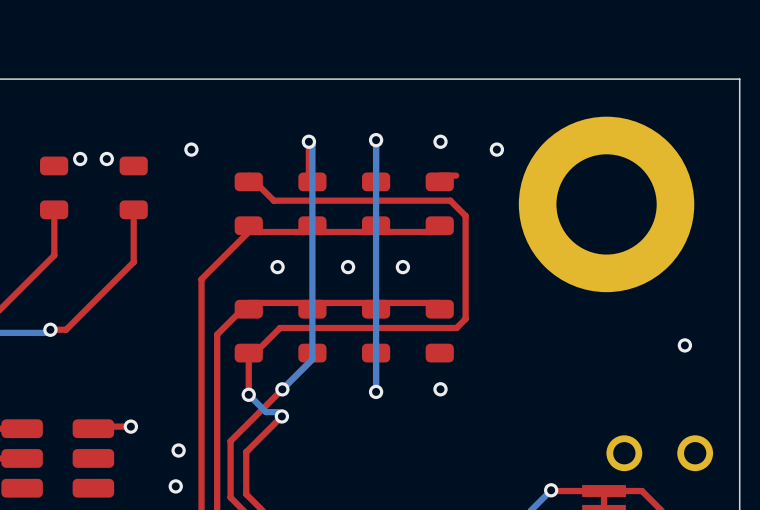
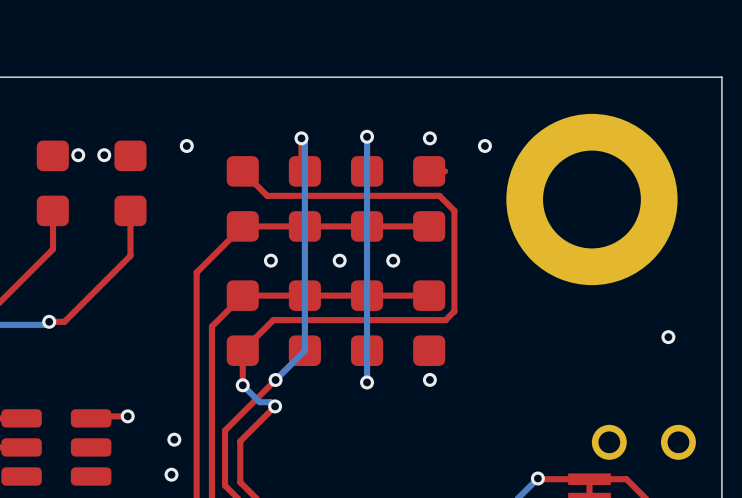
part footprint: [40, 156, 69, 220] -> [36, 140, 69, 227]
part footprint: [119, 156, 148, 220] -> [114, 140, 147, 227]
part footprint: [234, 172, 263, 236] -> [226, 156, 259, 242]
part footprint: [298, 172, 327, 236] -> [288, 156, 321, 242]
part footprint: [361, 172, 391, 236] -> [350, 156, 384, 242]
part footprint: [425, 172, 454, 236] -> [413, 156, 446, 242]
part footprint: [234, 299, 263, 363] -> [226, 280, 259, 366]
part footprint: [298, 299, 327, 363] -> [288, 280, 321, 366]
part footprint: [361, 299, 391, 363] -> [350, 280, 384, 366]
part footprint: [425, 299, 454, 363] -> [413, 280, 446, 366]

